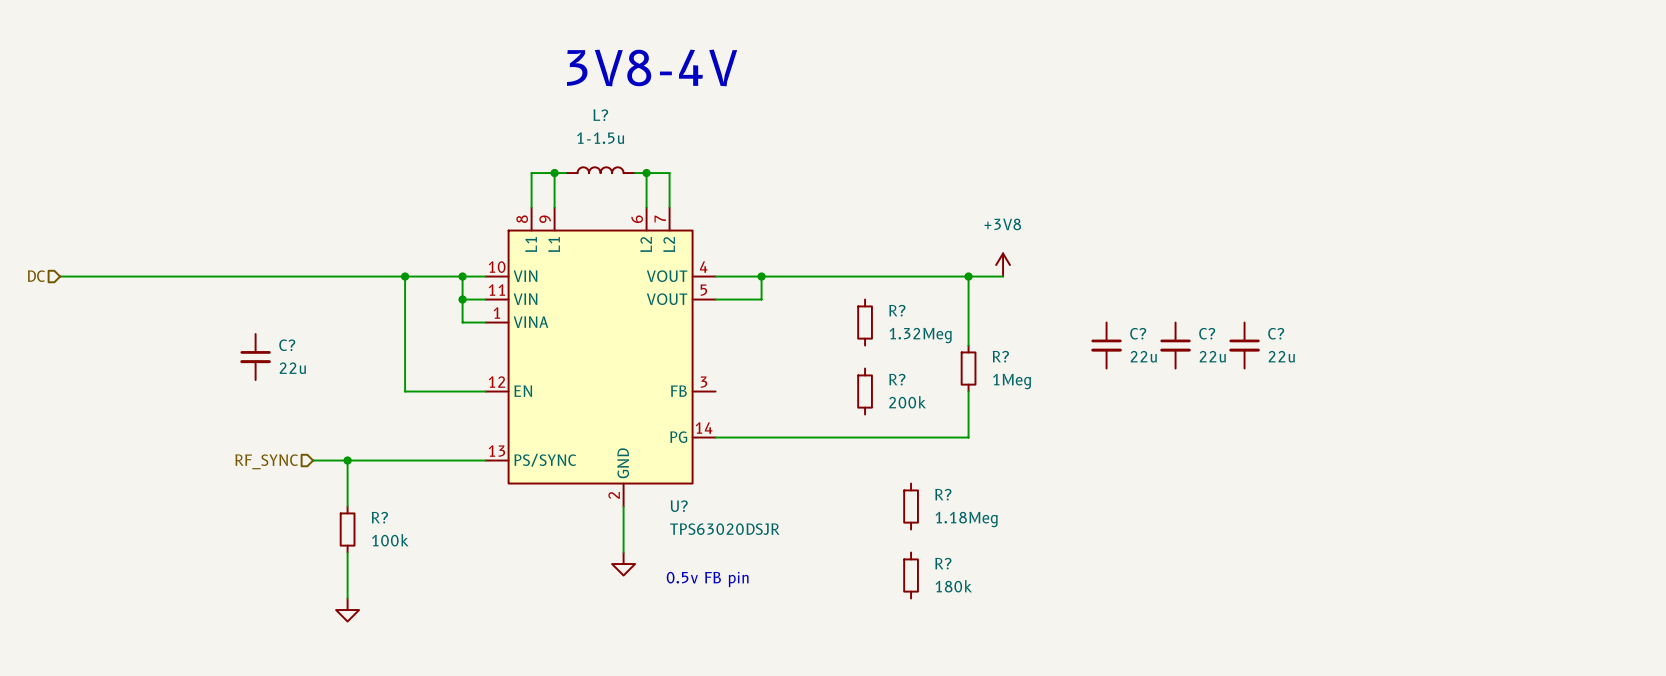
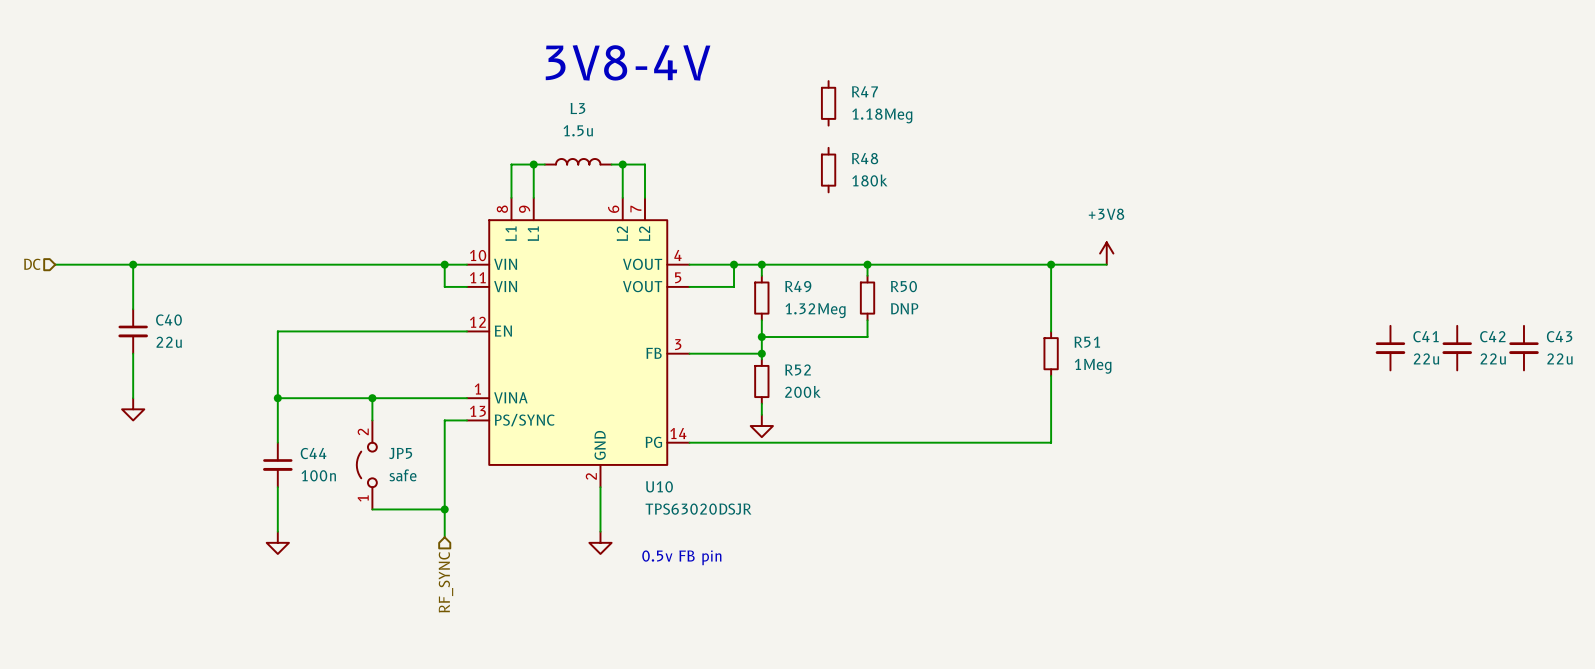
R47: none -> 1.18Meg (828, 103)
L? name: L? (600, 115) -> L3 (577, 108)
L? value: 1-1.5u (600, 138) -> 1.5u (578, 130)
R48: none -> 180k (828, 170)
power symbol position: +3V8 (1003, 265) -> +3V8 (1106, 253)
wire: none -> (133, 264) (133, 309)
junction: none -> (133, 264)
wire: (405, 276) (405, 391) (485, 391) -> none
junction: (405, 276) -> none
wire: none -> (761, 264) (761, 275)
junction: none -> (761, 264)
wire: none -> (867, 264) (867, 275)
junction: none -> (867, 264)
wire: (968, 276) (968, 345) -> (1051, 264) (1051, 331)
junction: (968, 276) -> none
wire: none -> (967, 264) (1106, 264)
junction: none -> (1051, 264)
wire: (462, 299) (462, 322) (485, 322) -> none
junction: (462, 299) -> none
R49: none -> 1.32Meg (761, 298)
R50: none -> DNP (867, 298)
R?: 1.32Meg (865, 322) -> none
wire: none -> (761, 320) (761, 359)
wire: none -> (867, 320) (867, 337) (761, 337)
C40: none -> 22u (133, 331)
wire: none -> (466, 331) (277, 331) (277, 442)
C?: 22u (1106, 345) -> none
C?: 22u (1175, 345) -> none
C?: 22u (1244, 345) -> none
junction: none -> (761, 337)
C?: 22u (255, 357) -> none
U?: TPS63020DSJR (600, 357) -> none
U10: none -> TPS63020DSJR (578, 342)
C41: none -> 22u (1390, 348)
C42: none -> 22u (1457, 348)
C43: none -> 22u (1523, 348)
wire: none -> (133, 353) (133, 398)
wire: none -> (689, 353) (761, 353)
junction: none -> (761, 353)
R?: 1Meg (968, 368) -> none
R51: none -> 1Meg (1051, 353)
R?: 200k (865, 391) -> none
wire: (968, 391) (968, 437) (715, 437) -> none
wire: none -> (1051, 375) (1051, 442) (689, 442)
R52: none -> 200k (761, 381)
wire: none -> (277, 398) (466, 398)
junction: none -> (277, 398)
wire: none -> (372, 398) (372, 420)
junction: none -> (372, 398)
wire: none -> (761, 403) (761, 414)
power symbol: none -> (133, 409)
wire: none -> (466, 420) (444, 420) (444, 537)
power symbol: none -> (761, 426)
wire: (313, 460) (485, 460) -> none
wire: (347, 460) (347, 506) -> (277, 487) (277, 531)
junction: (347, 460) -> none
hierarchical label rotation: 0° (266, 461) -> 90° counterclockwise (445, 582)
hierarchical label position: RF_SYNC (266, 461) -> RF_SYNC (445, 582)
C44: none -> 100n (277, 464)
JP5: none -> safe (366, 464)
R?: 1.18Meg (911, 506) -> none
R?: 100k (347, 529) -> none
wire: none -> (372, 509) (444, 509)
junction: none -> (444, 509)
wire: (347, 552) (347, 598) -> none
R?: 180k (911, 575) -> none
power symbol position: (347, 610) -> (277, 542)

